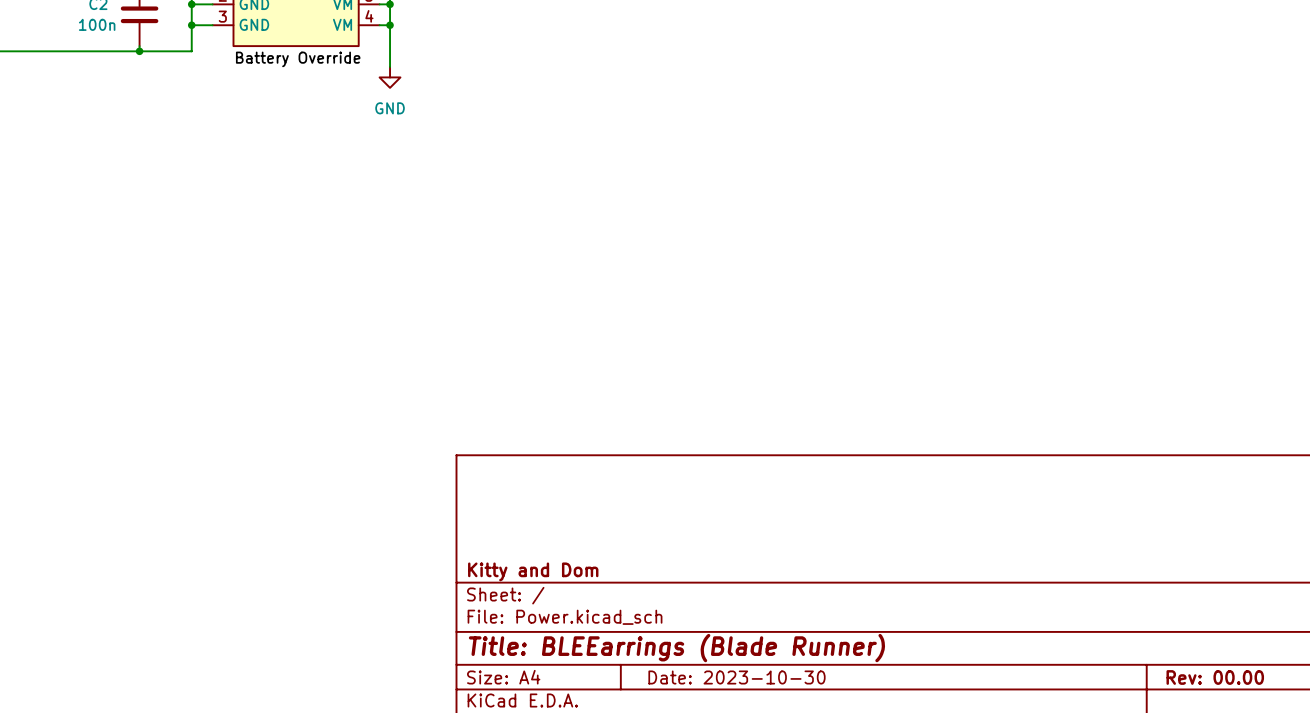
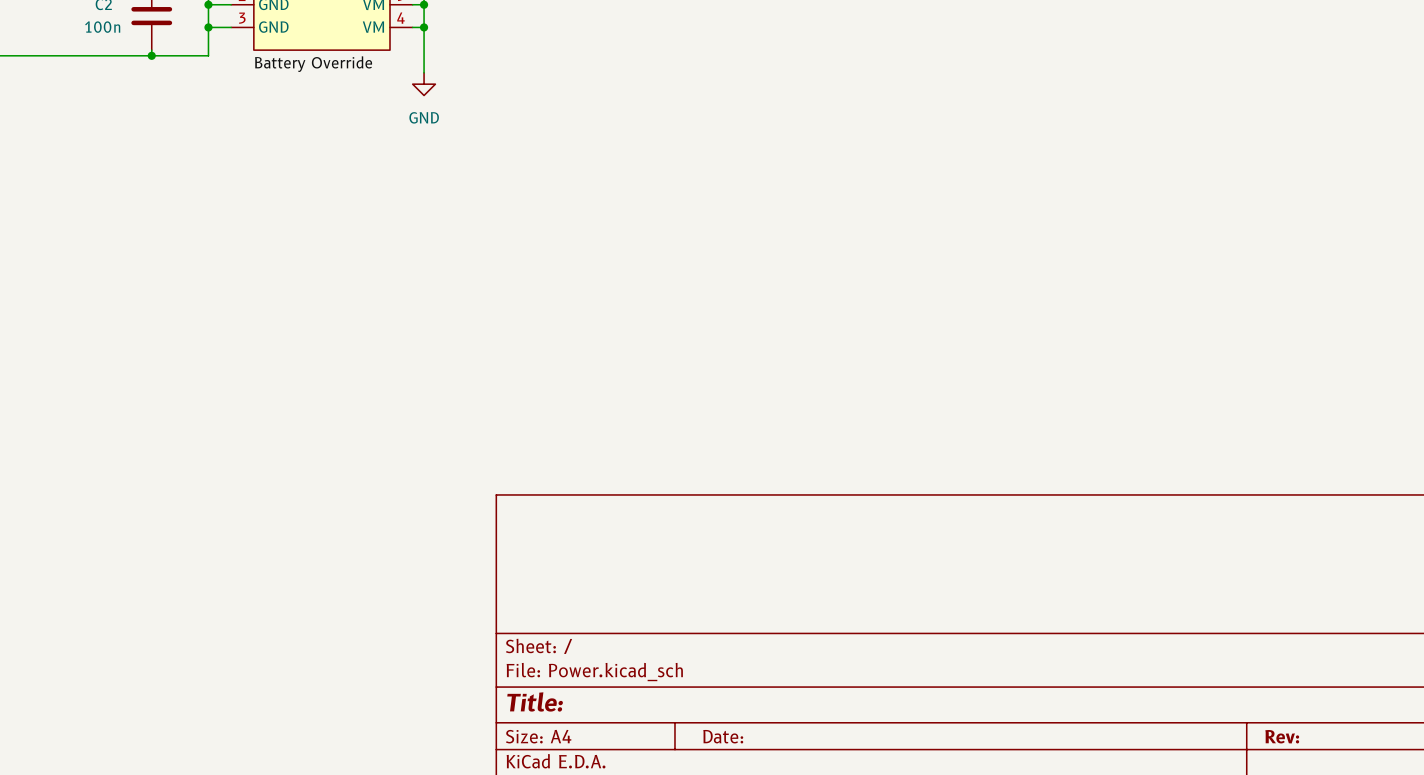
title block: Kitty and Dom (533, 571) -> none
title block: Title: BLEEarrings (Blade Runner) (676, 648) -> Title: (535, 701)
title block: Date: 2023-10-30 (736, 677) -> Date: (723, 736)
title block: Rev: 00.00 (1215, 677) -> Rev: (1282, 736)

